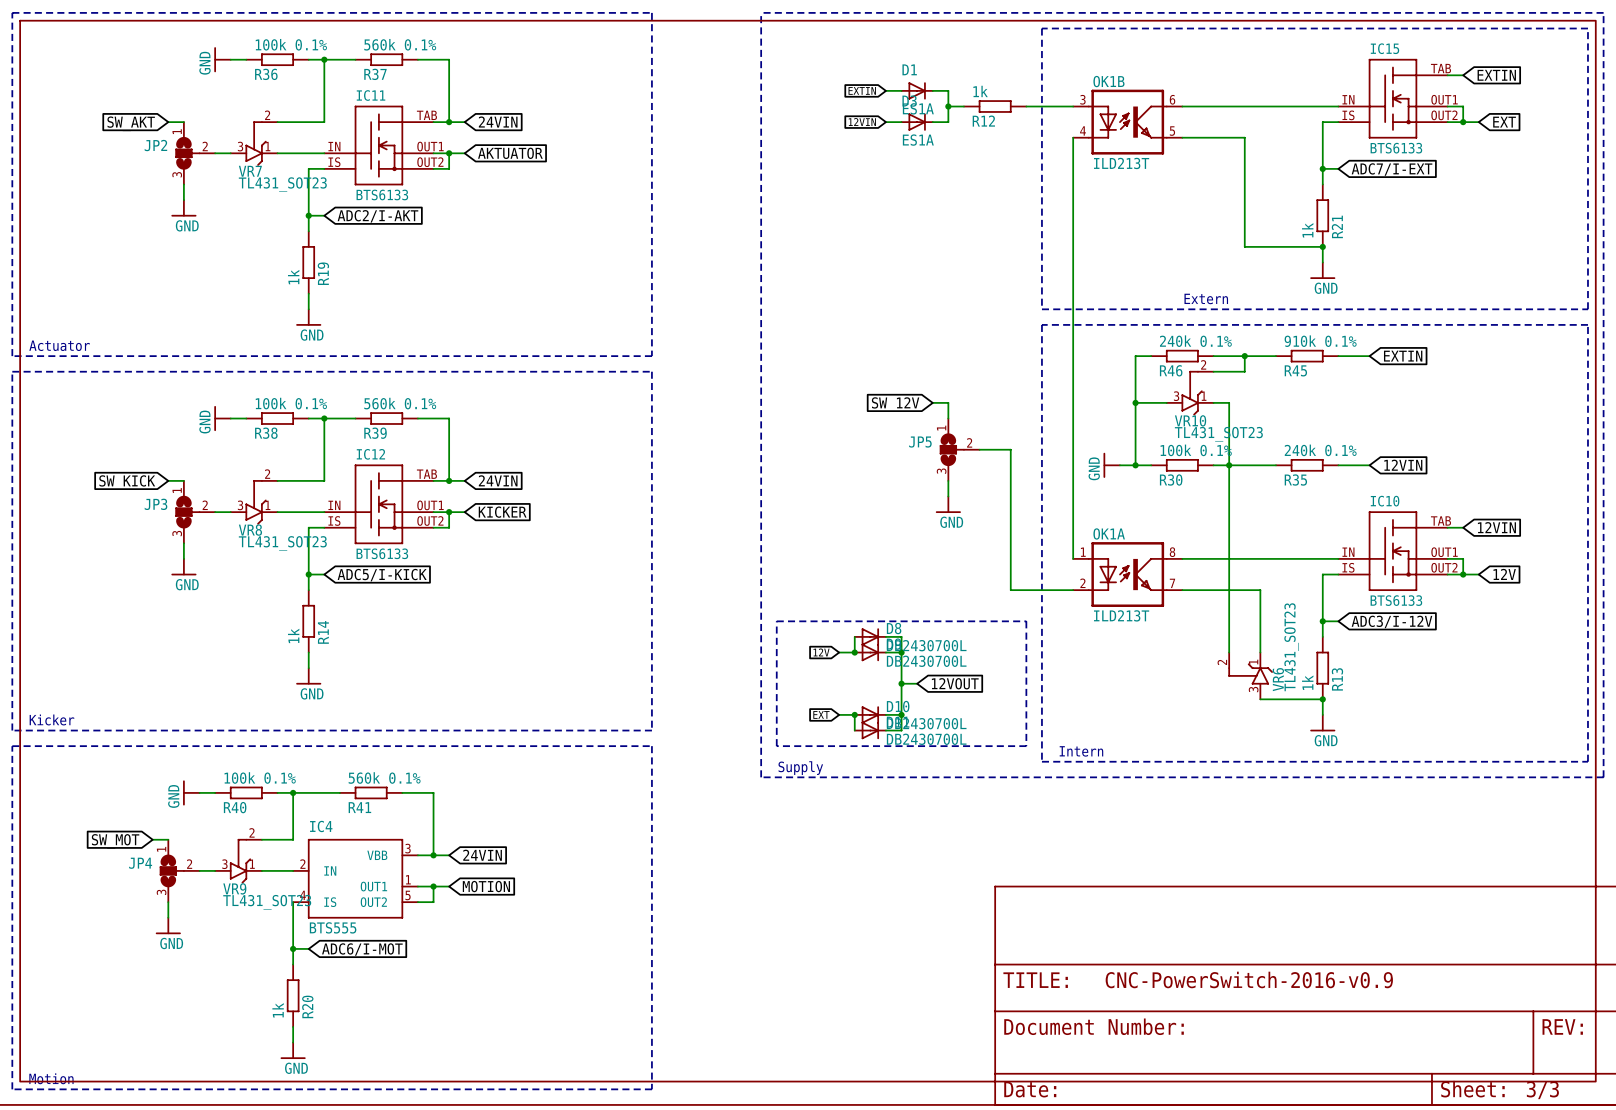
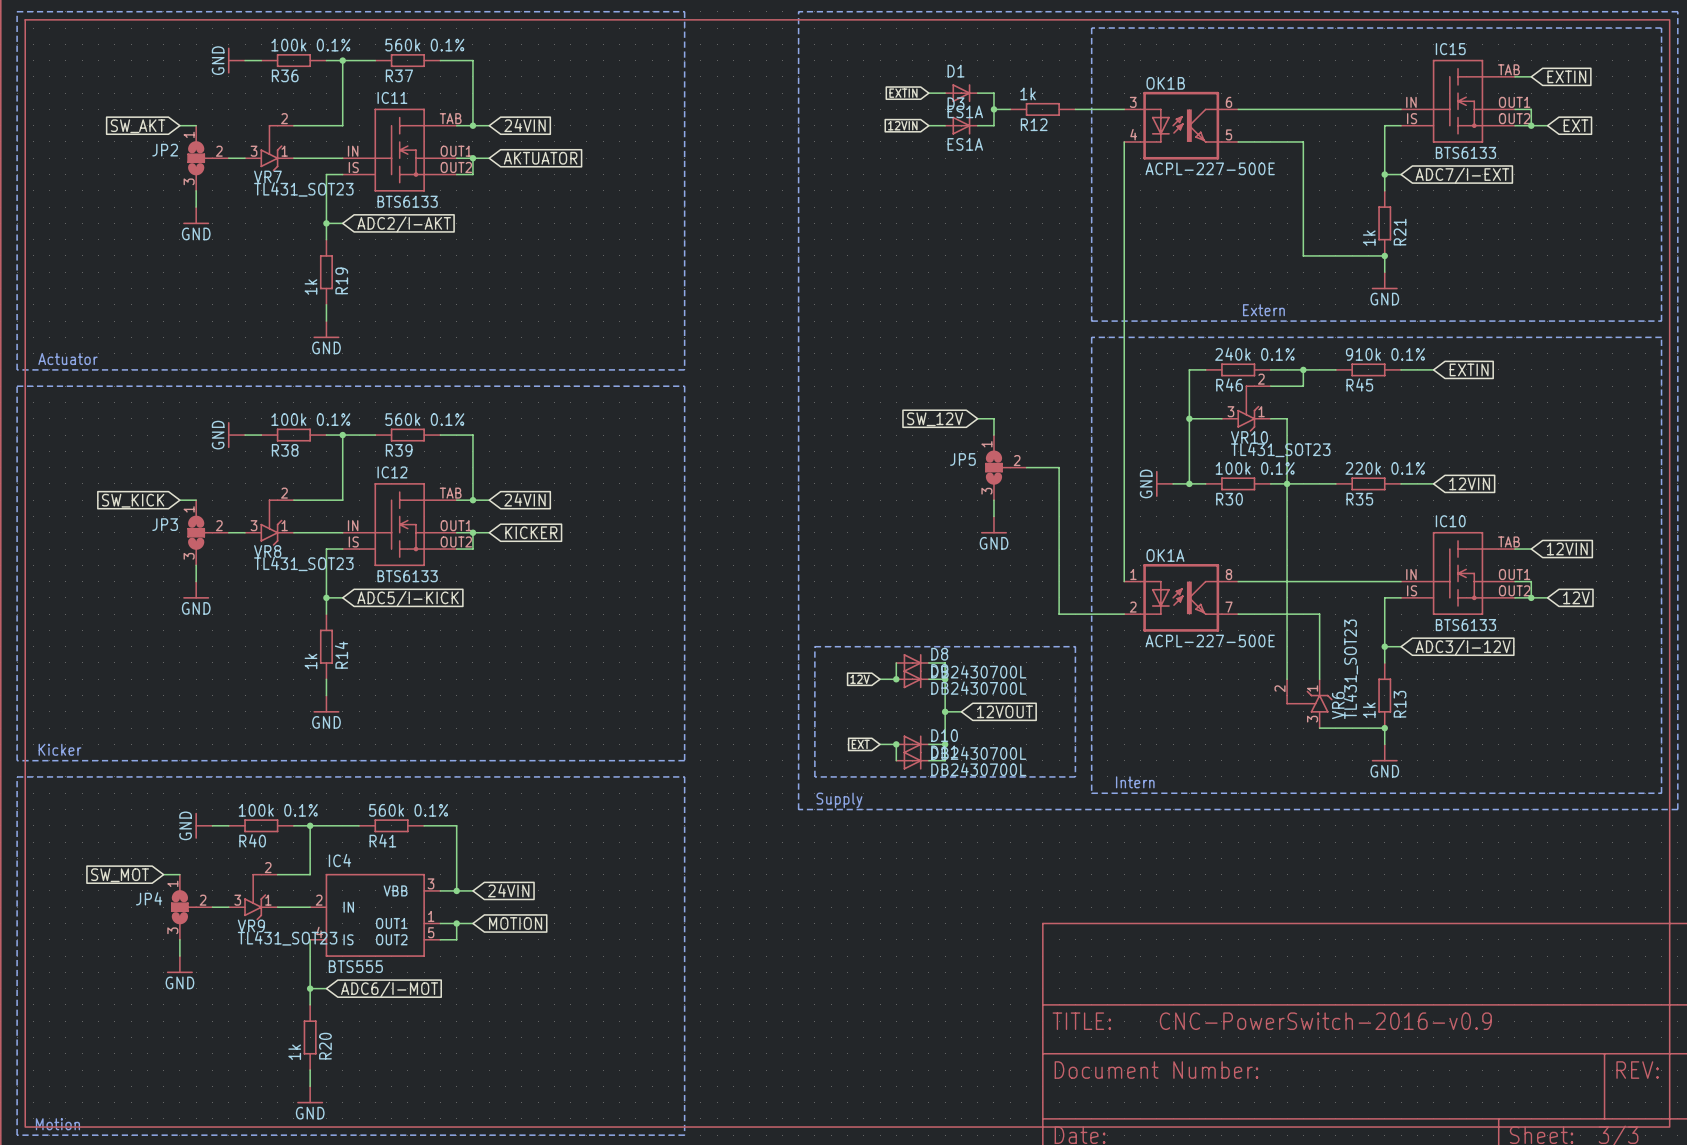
OK1B value: ILD213T (1121, 163) -> ACPL-227-500E (1210, 168)
R35 value: 240k 0.1% (1320, 450) -> 220k 0.1% (1385, 468)
OK1A value: ILD213T (1121, 615) -> ACPL-227-500E (1210, 641)

